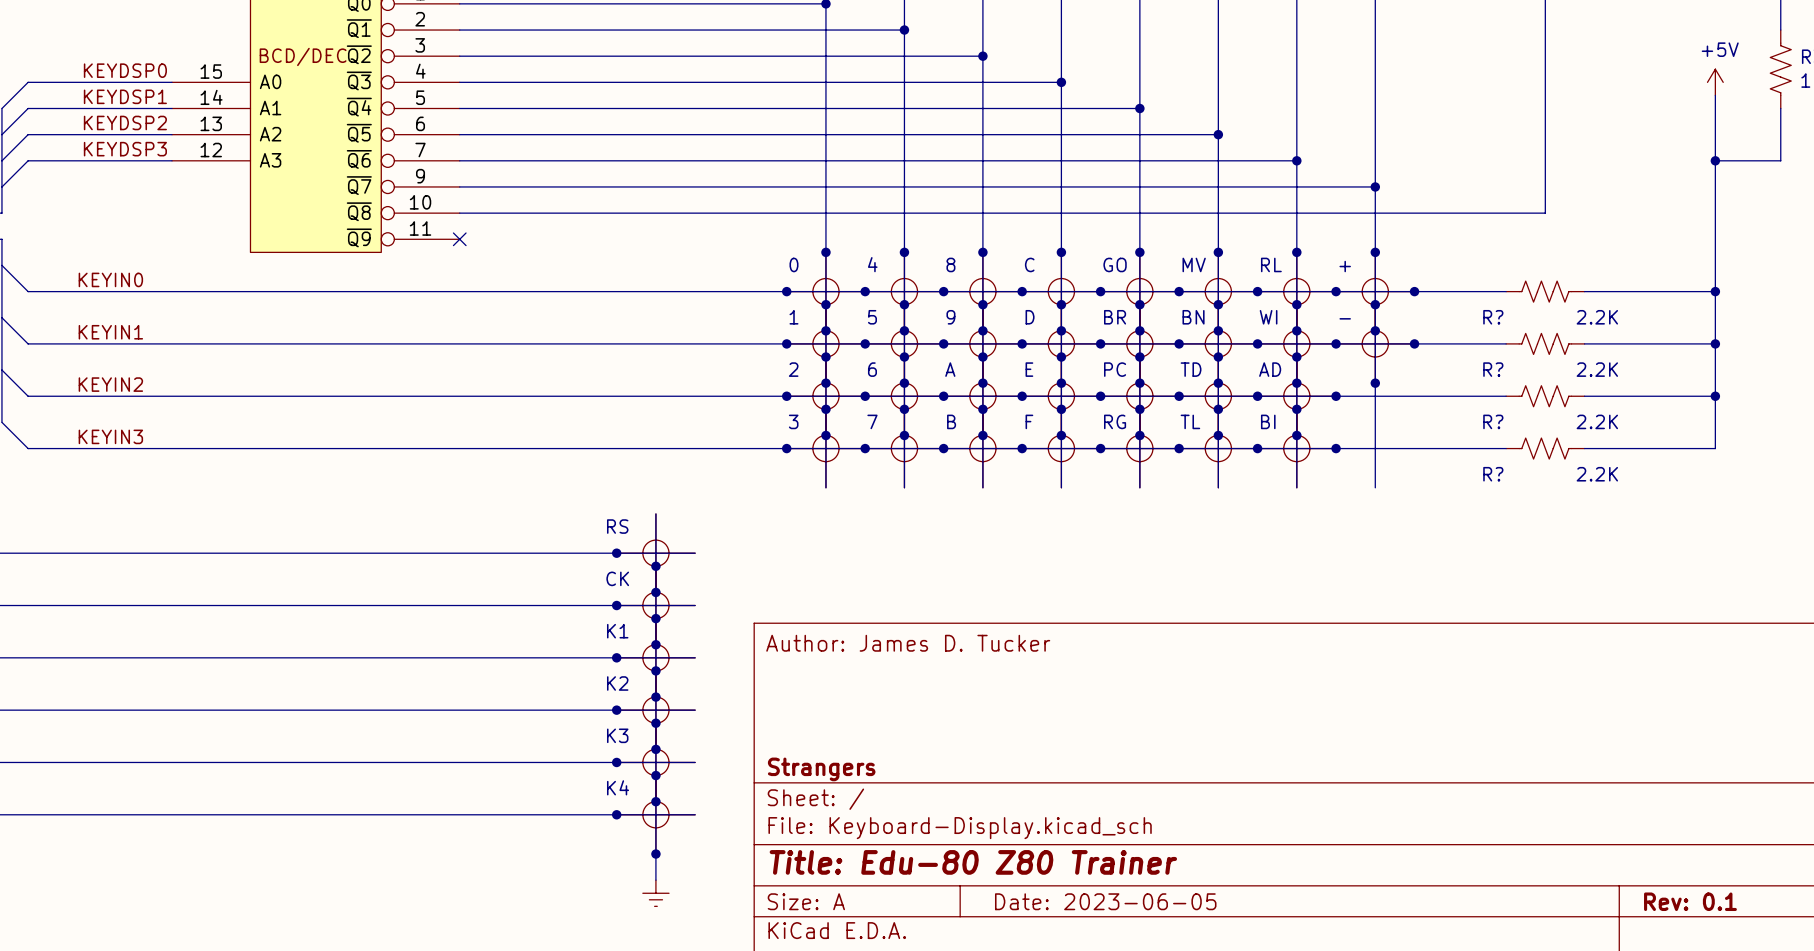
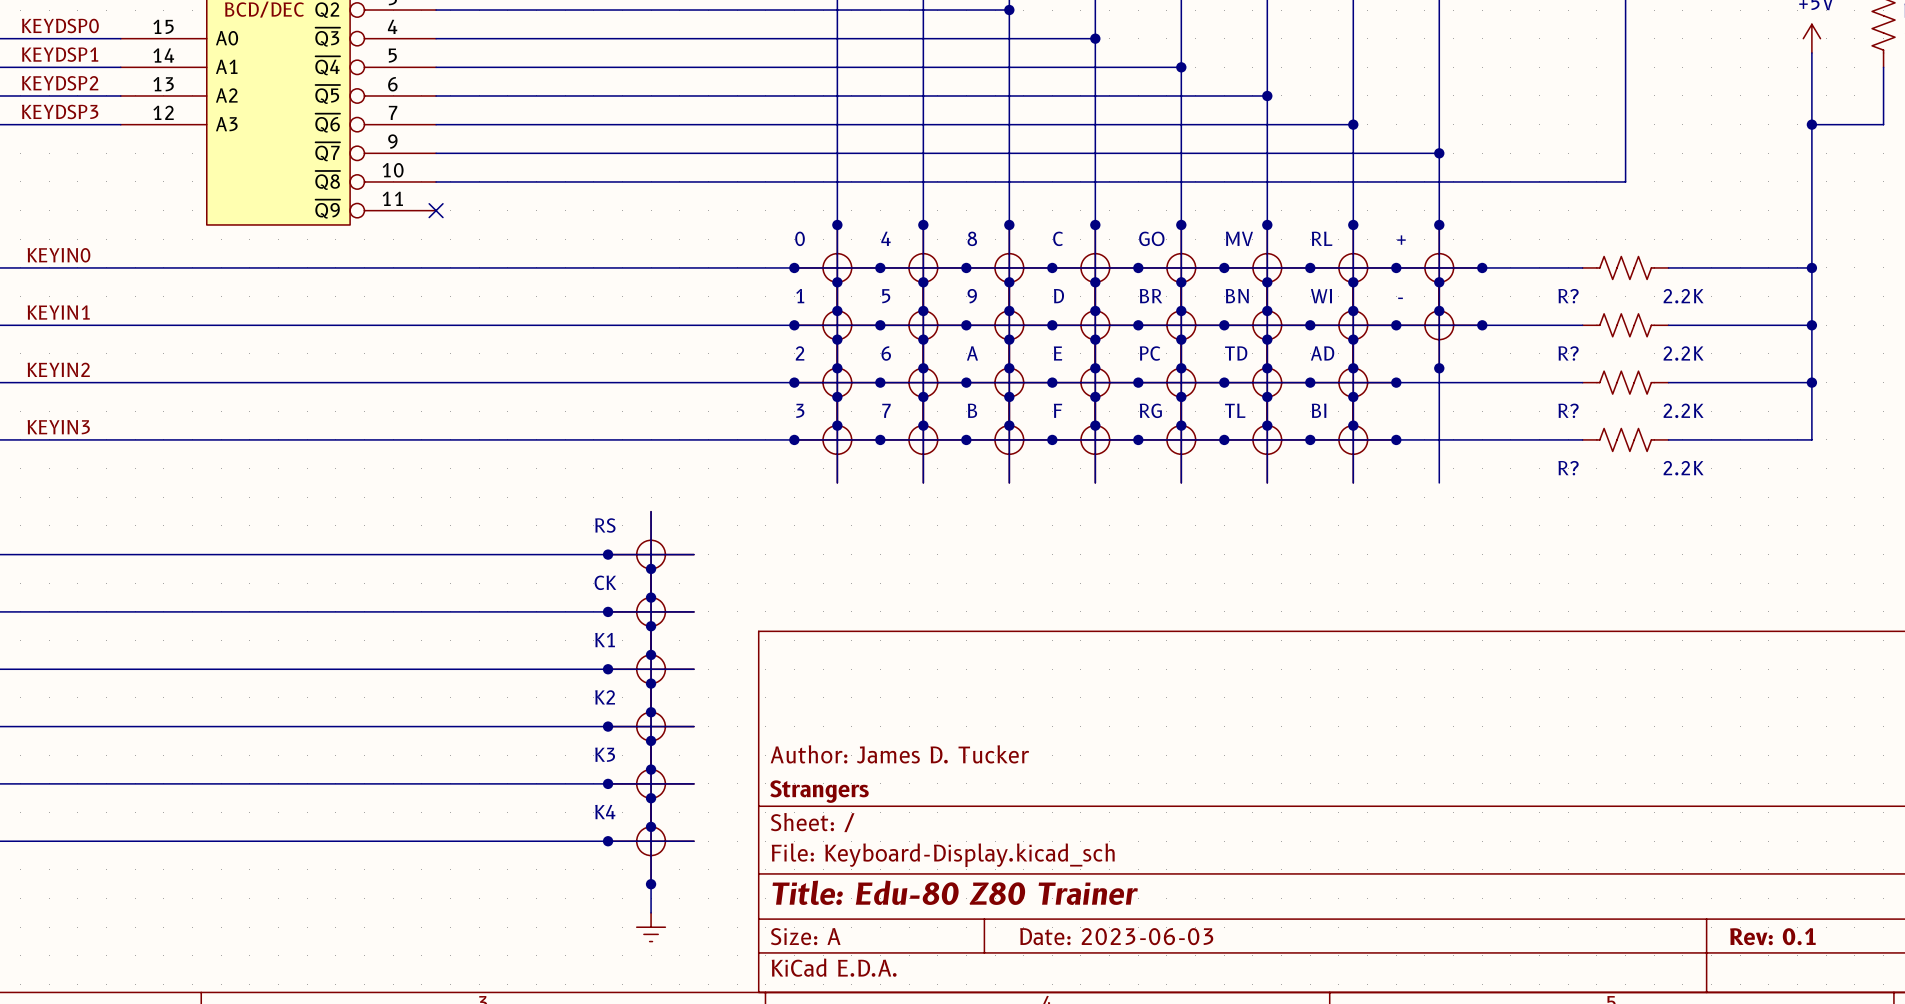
title block position: Author: James D. Tucker (908, 643) -> Author: James D. Tucker (899, 754)
title block: Date: 2023-06-05 (1105, 901) -> Date: 2023-06-03 (1116, 936)

